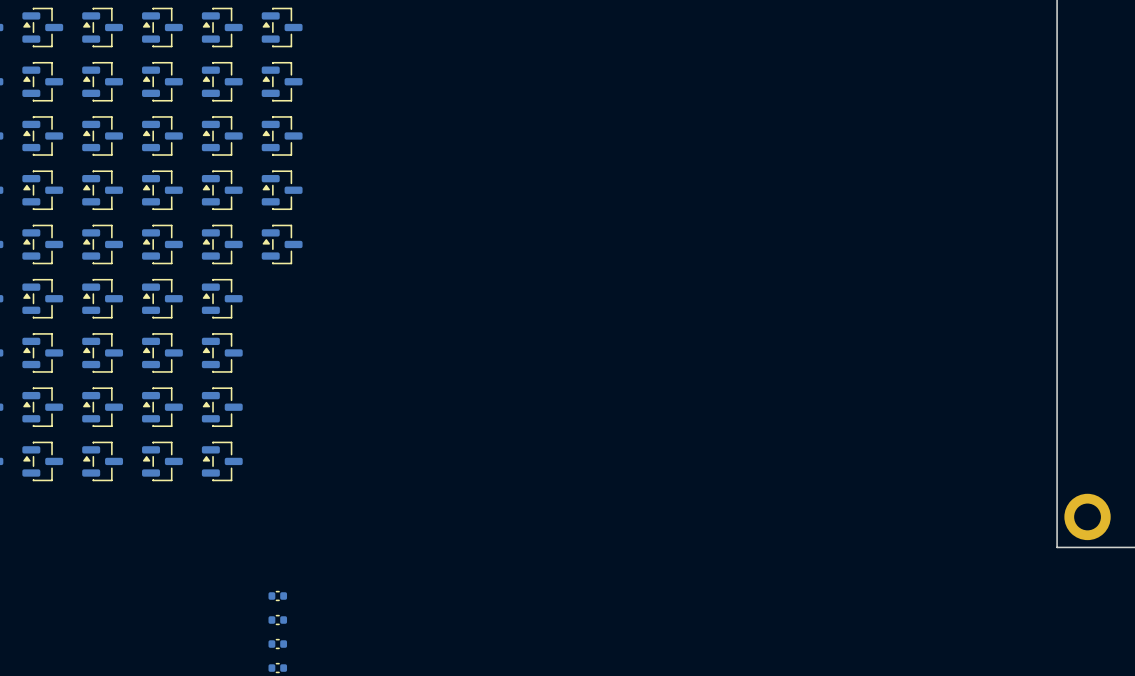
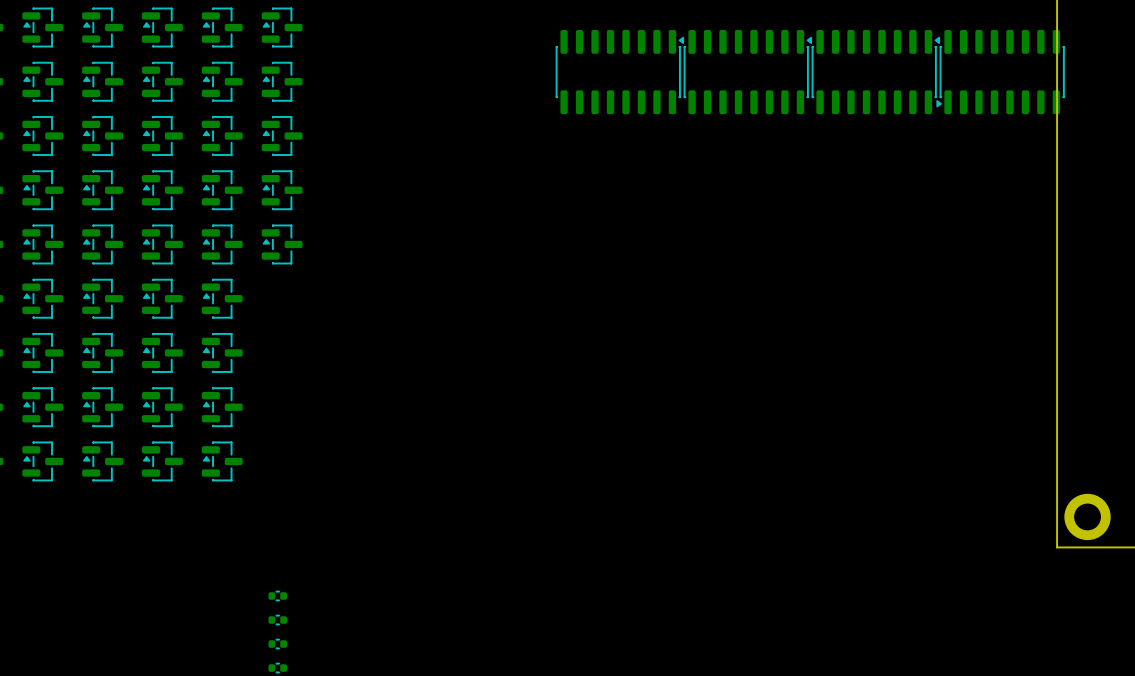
part: none -> (619, 72)
part: none -> (747, 72)
part: none -> (875, 72)
part: none -> (1000, 72)

